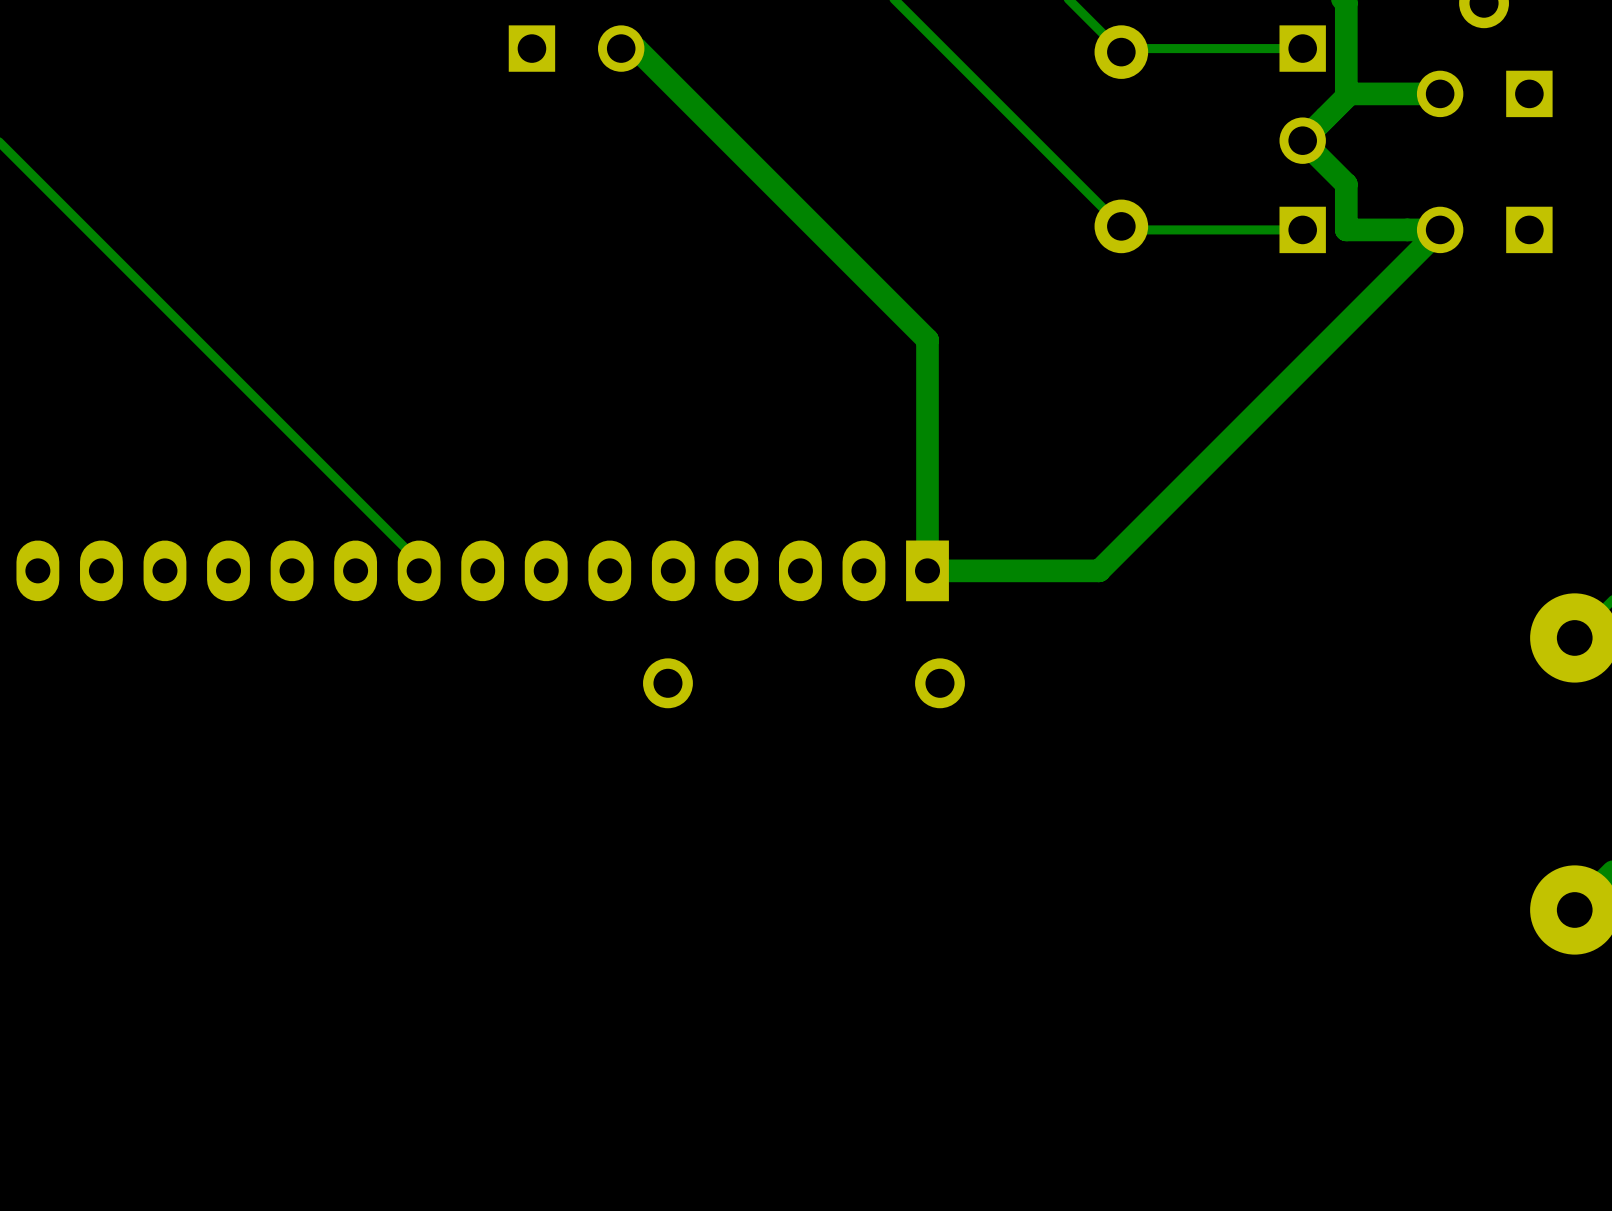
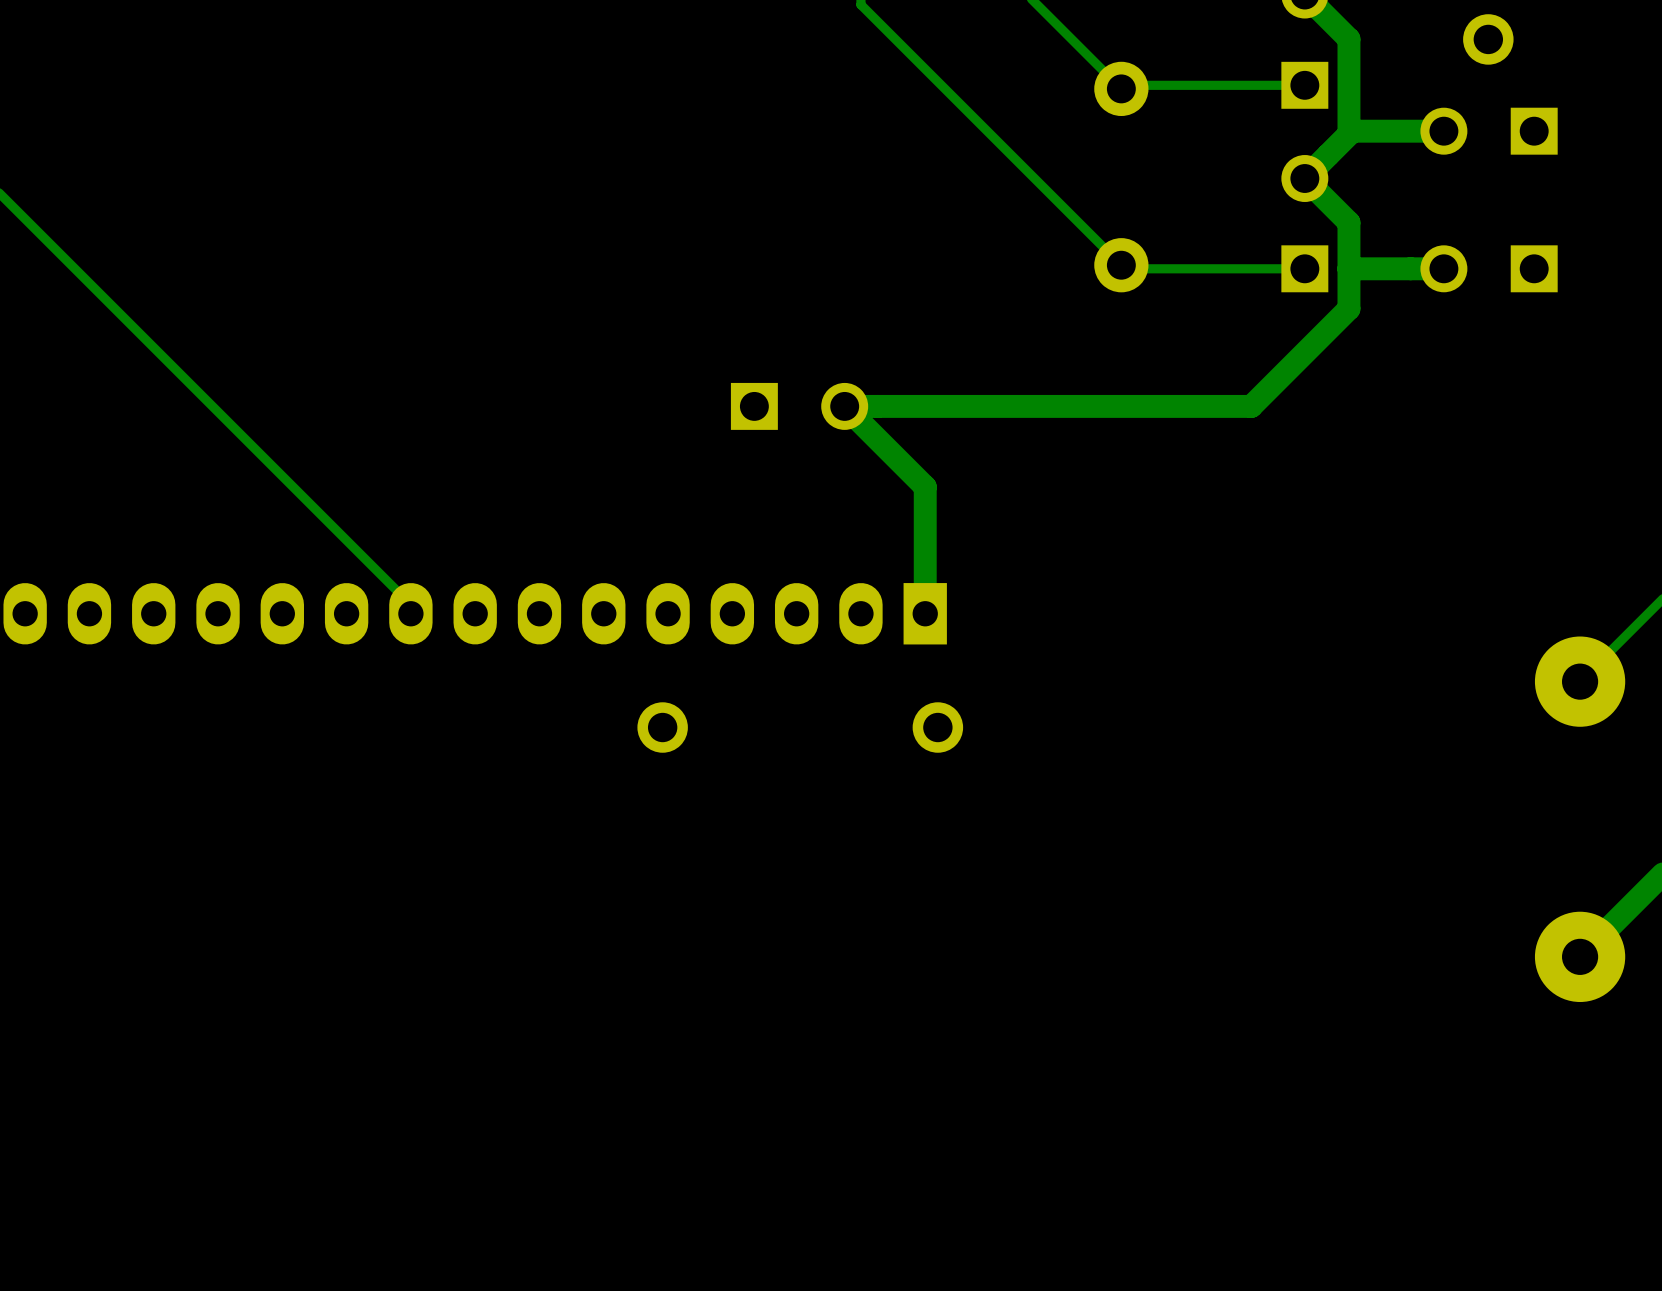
part position: (576, 48) -> (799, 406)
track: (621, 48) (636, 48) (927, 339) (927, 445) -> (1348, 268) (1348, 308) (1251, 406) (844, 406) (925, 486)
track: (1440, 229) (1099, 570) (927, 570) -> none

